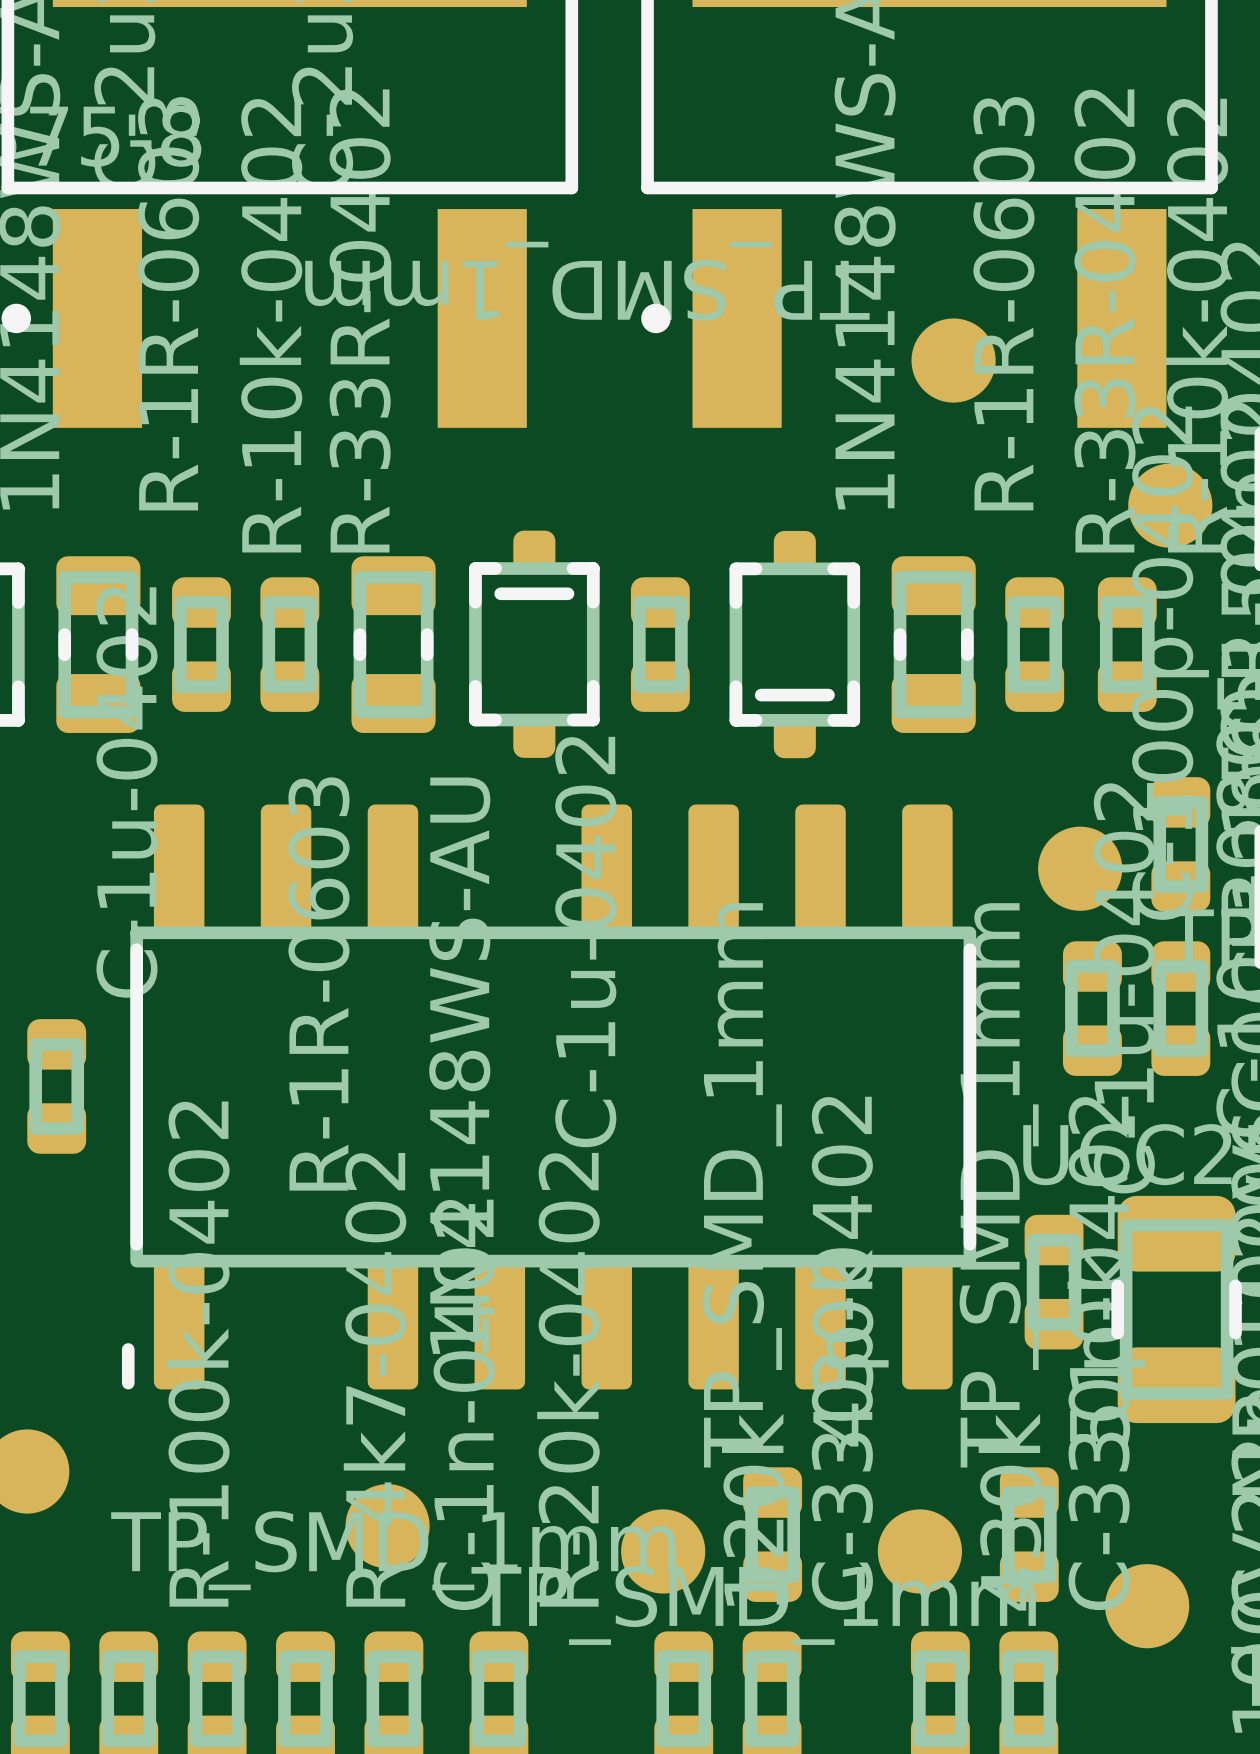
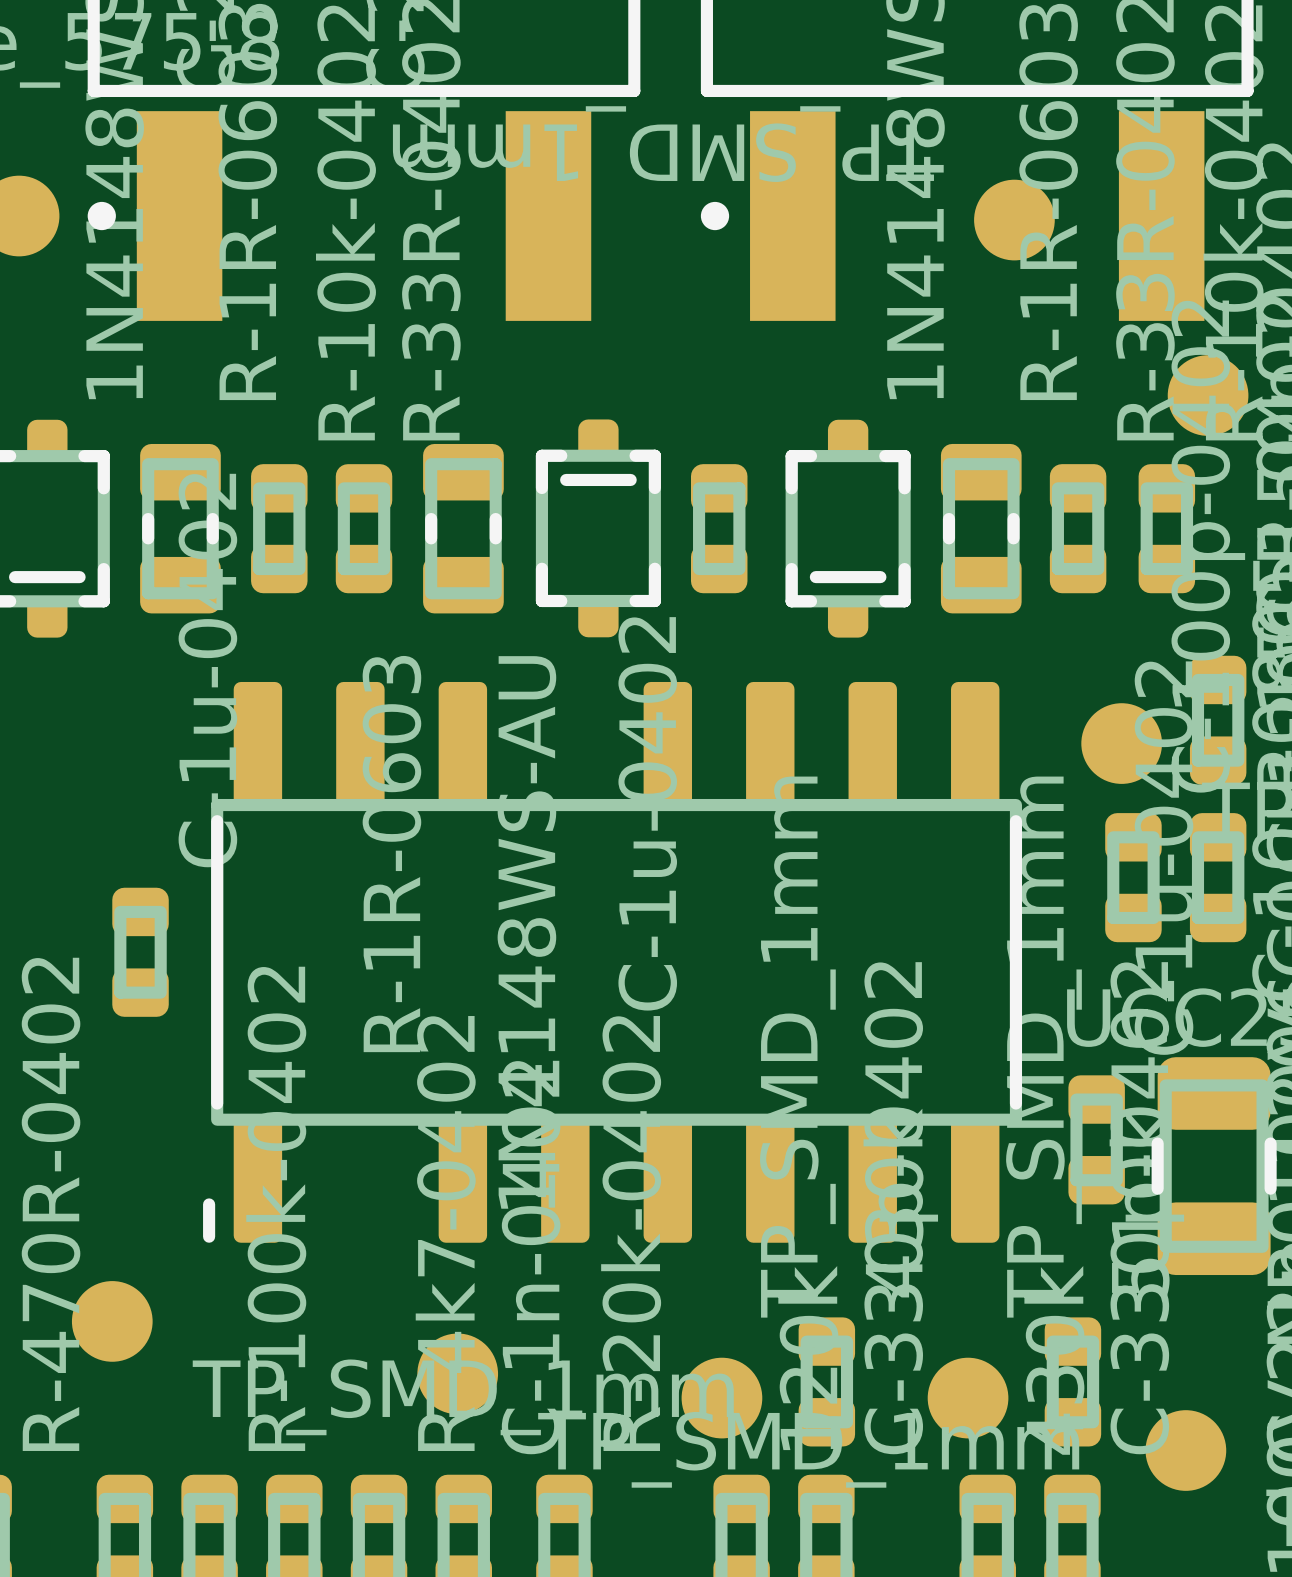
part position: (953, 360) -> (1014, 220)

